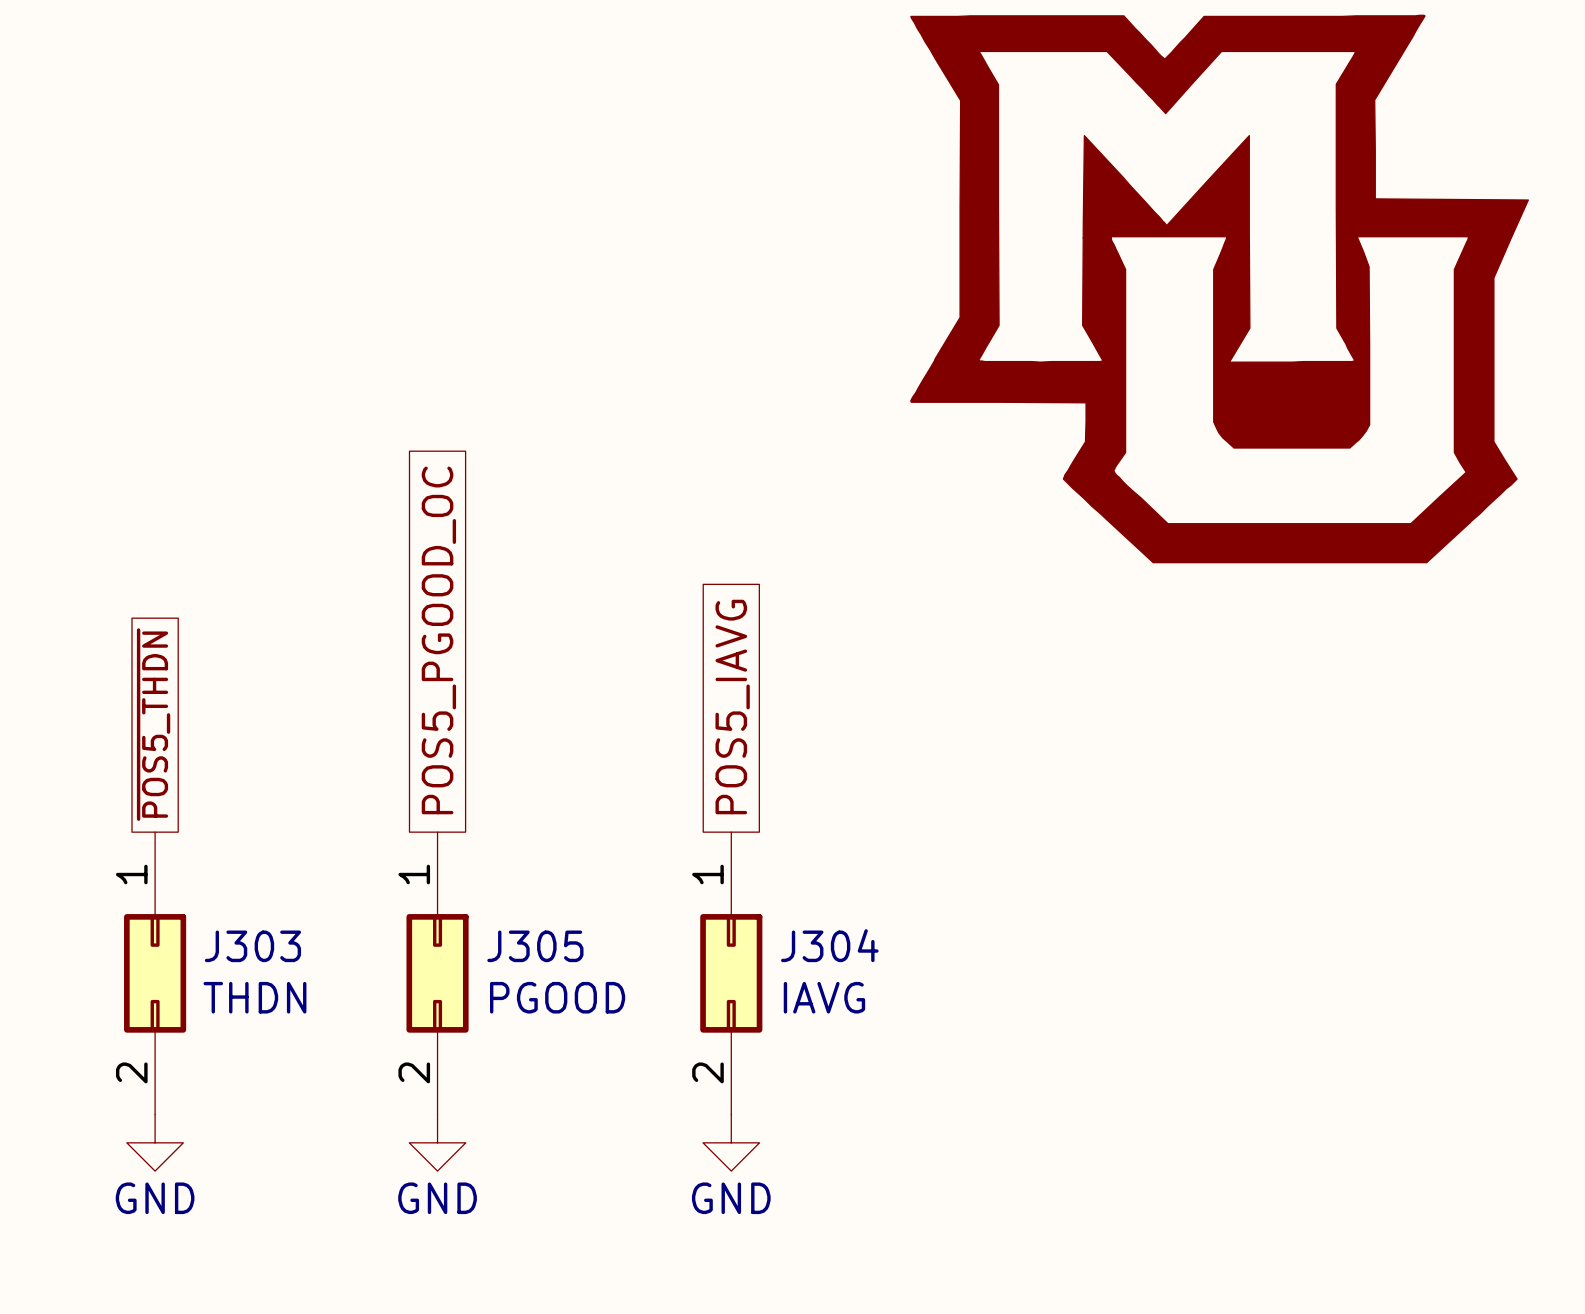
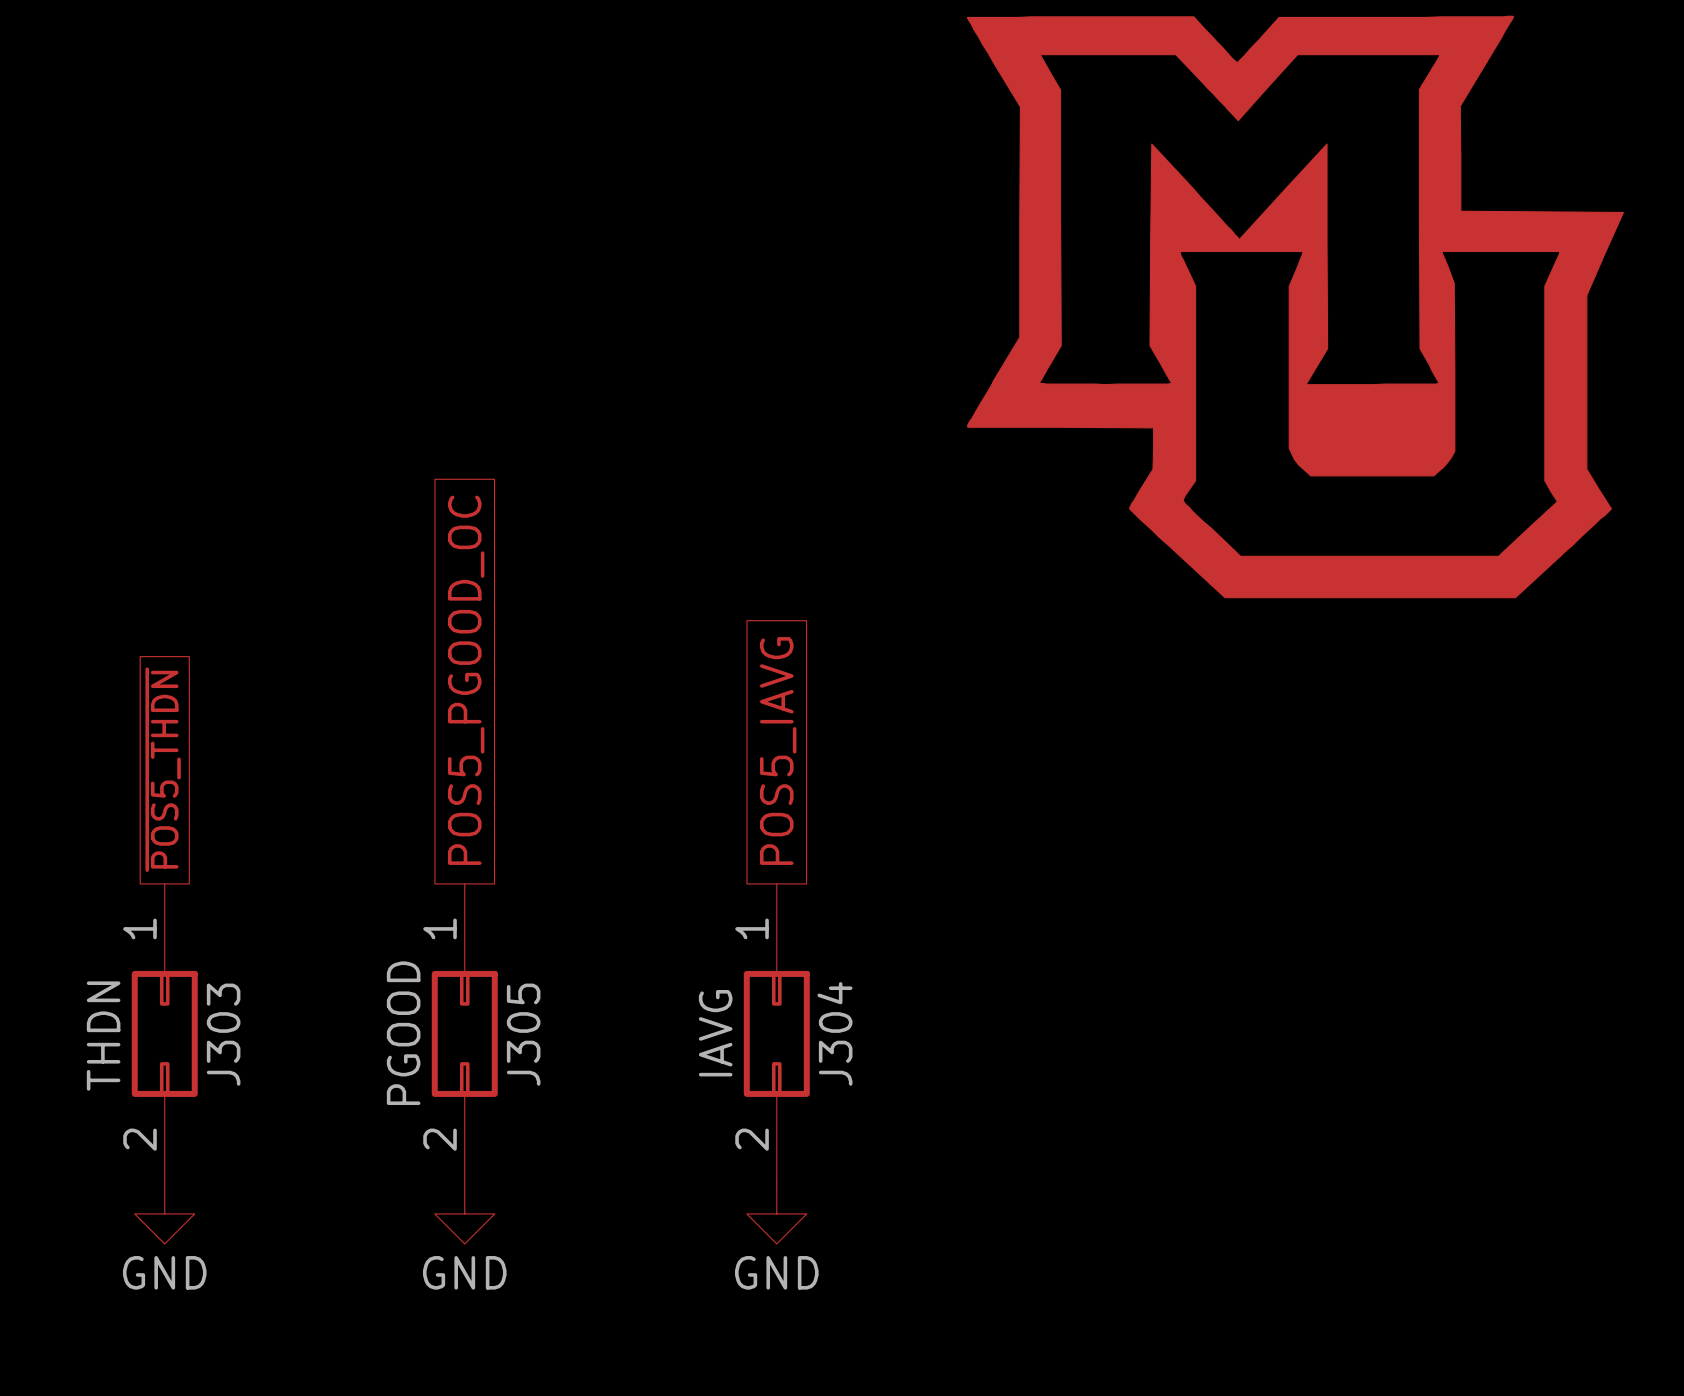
J304 name rotation: 0° (829, 945) -> 90° counterclockwise (834, 1033)
J303 name rotation: 0° (252, 946) -> 90° counterclockwise (223, 1034)
J305 name rotation: 0° (535, 946) -> 90° counterclockwise (523, 1034)
J303 value rotation: 0° (254, 997) -> 90° counterclockwise (103, 1036)
J303 value position: THDN (254, 997) -> THDN (103, 1036)
J305 value rotation: 0° (557, 997) -> 90° counterclockwise (403, 1033)
J305 value position: PGOOD (557, 997) -> PGOOD (403, 1033)
J304 value rotation: 0° (824, 997) -> 90° counterclockwise (715, 1033)
J304 value position: IAVG (824, 997) -> IAVG (715, 1033)

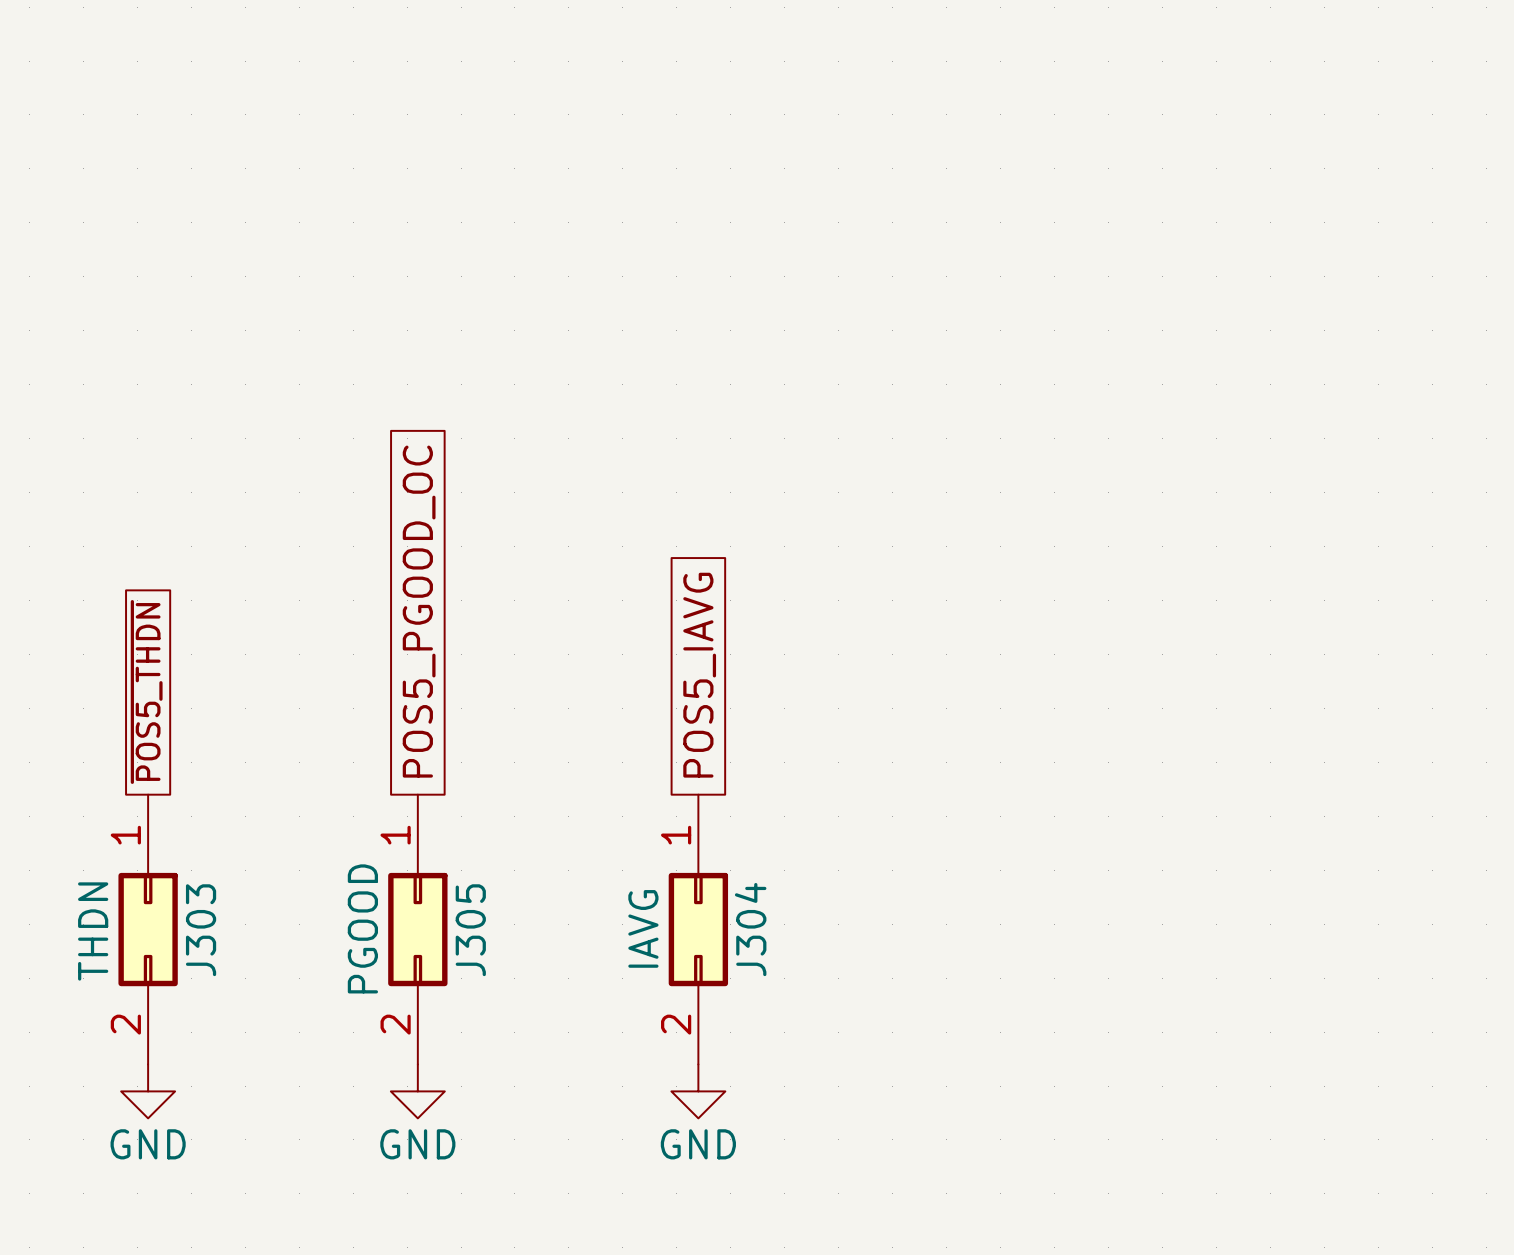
power symbol: (1295, 306) -> none

